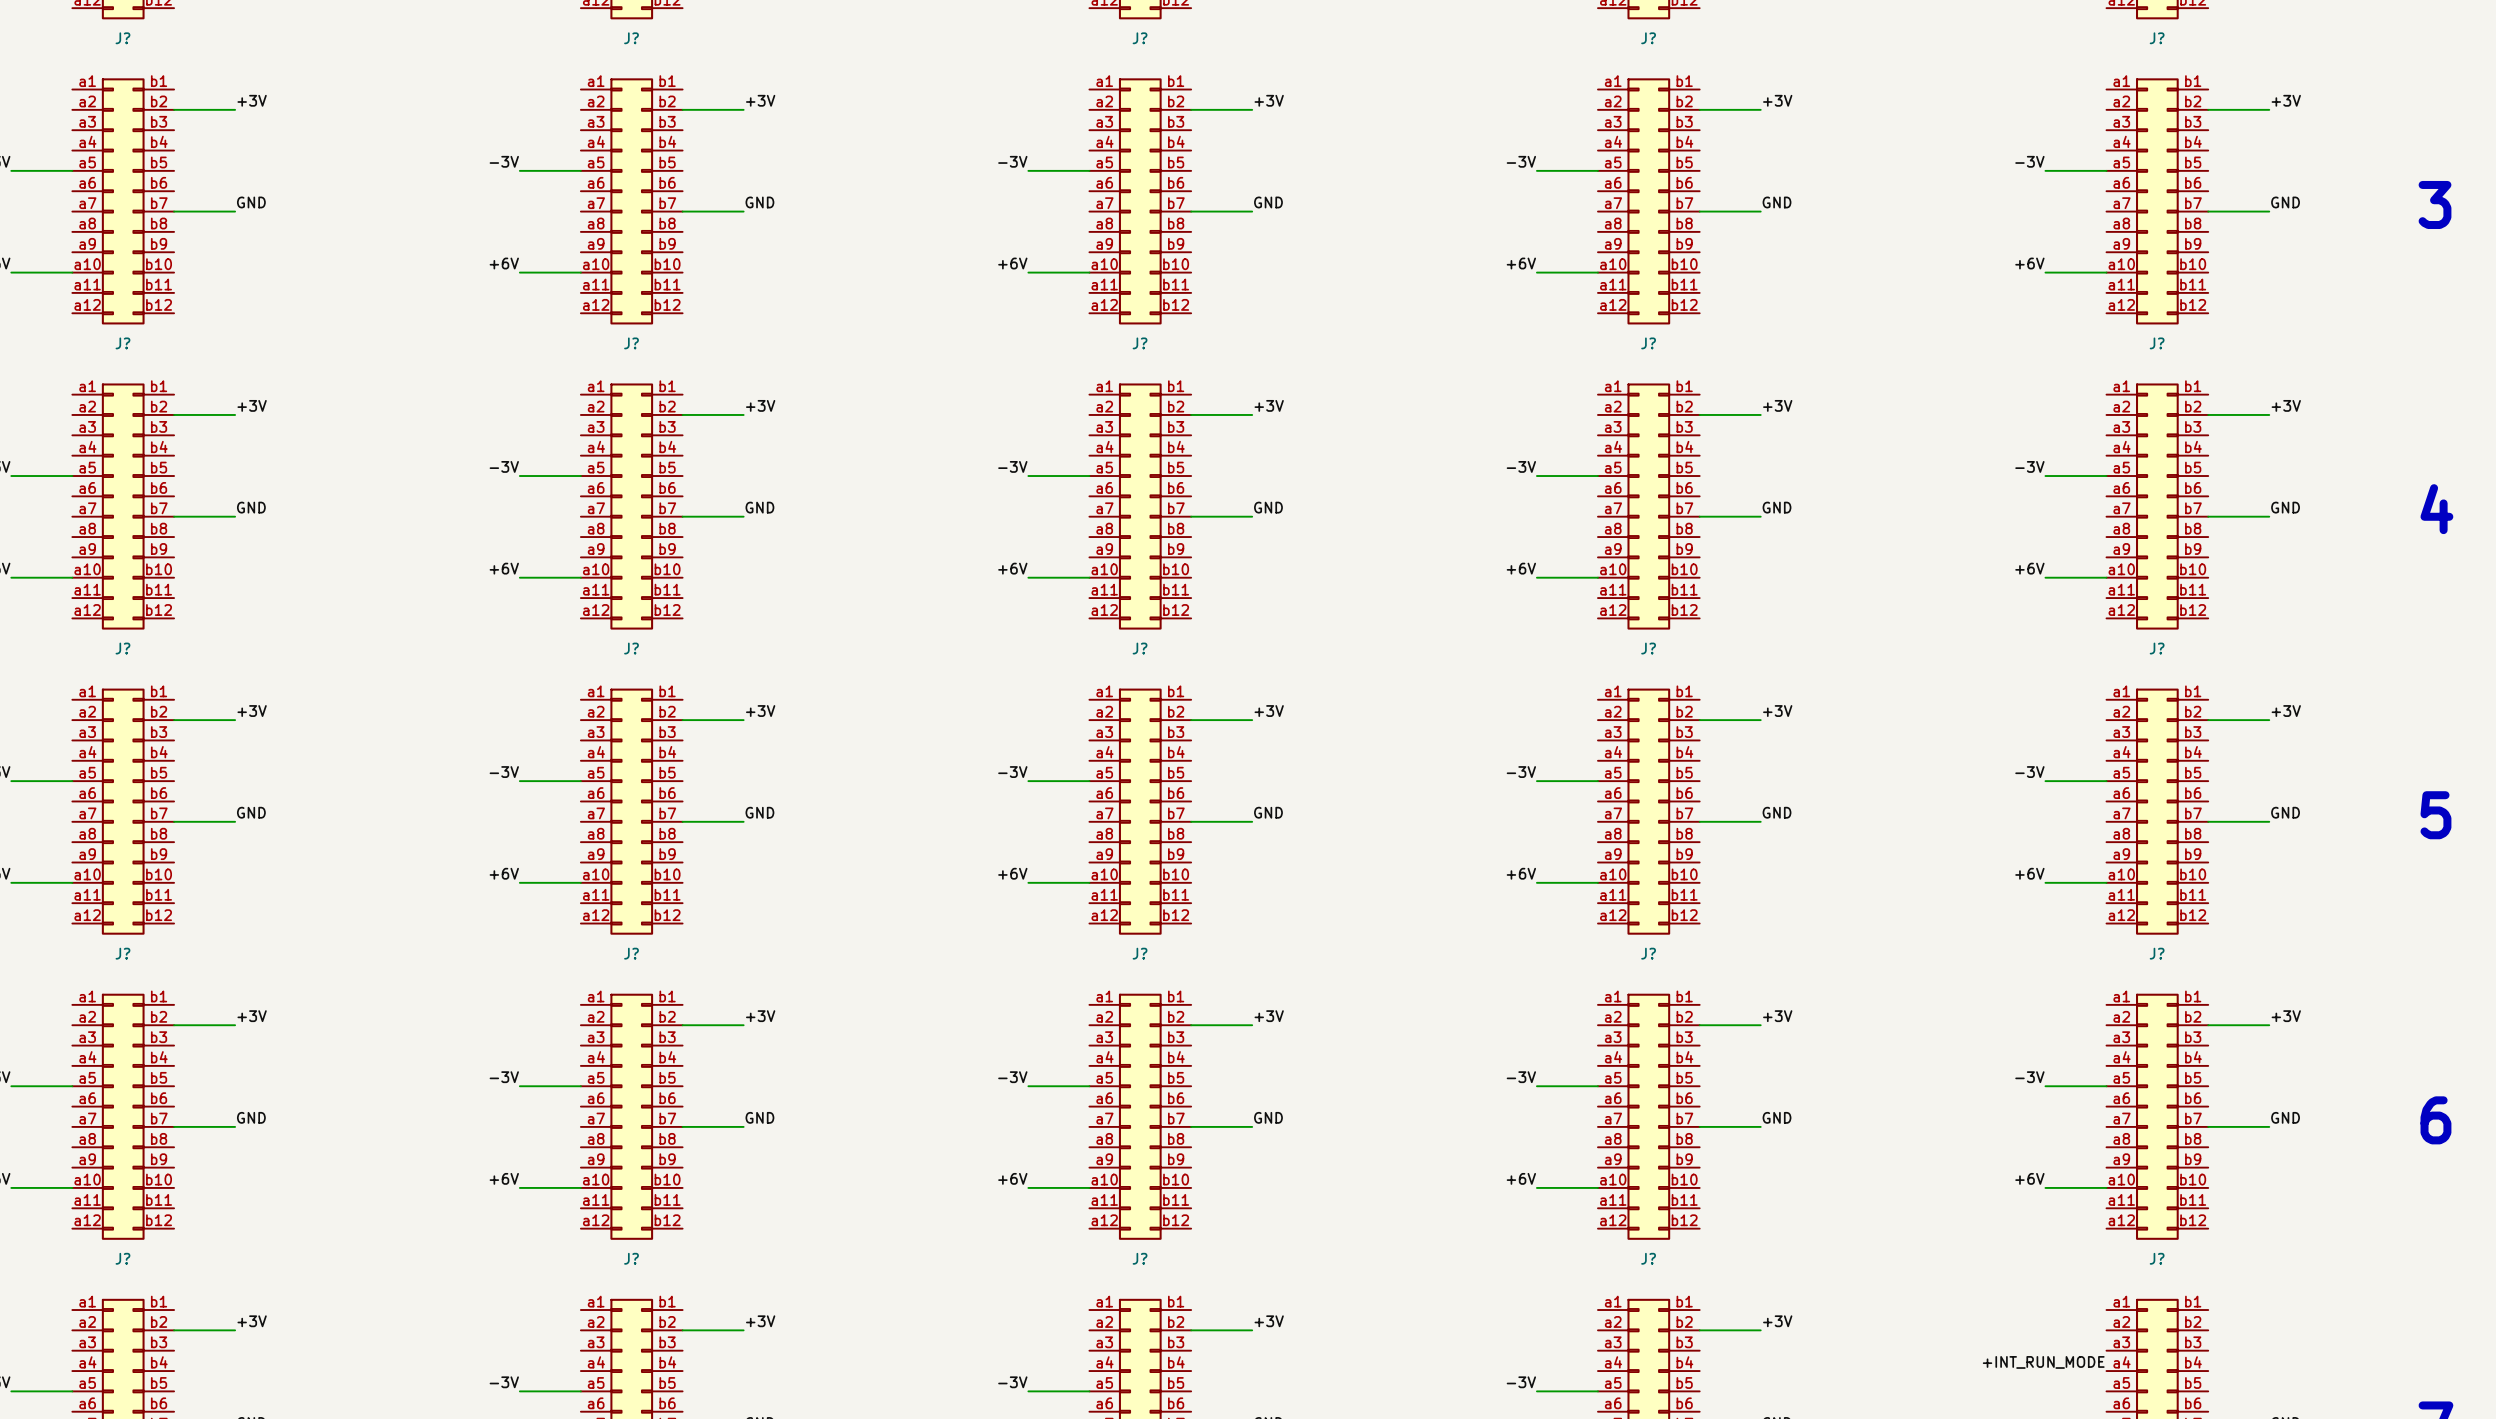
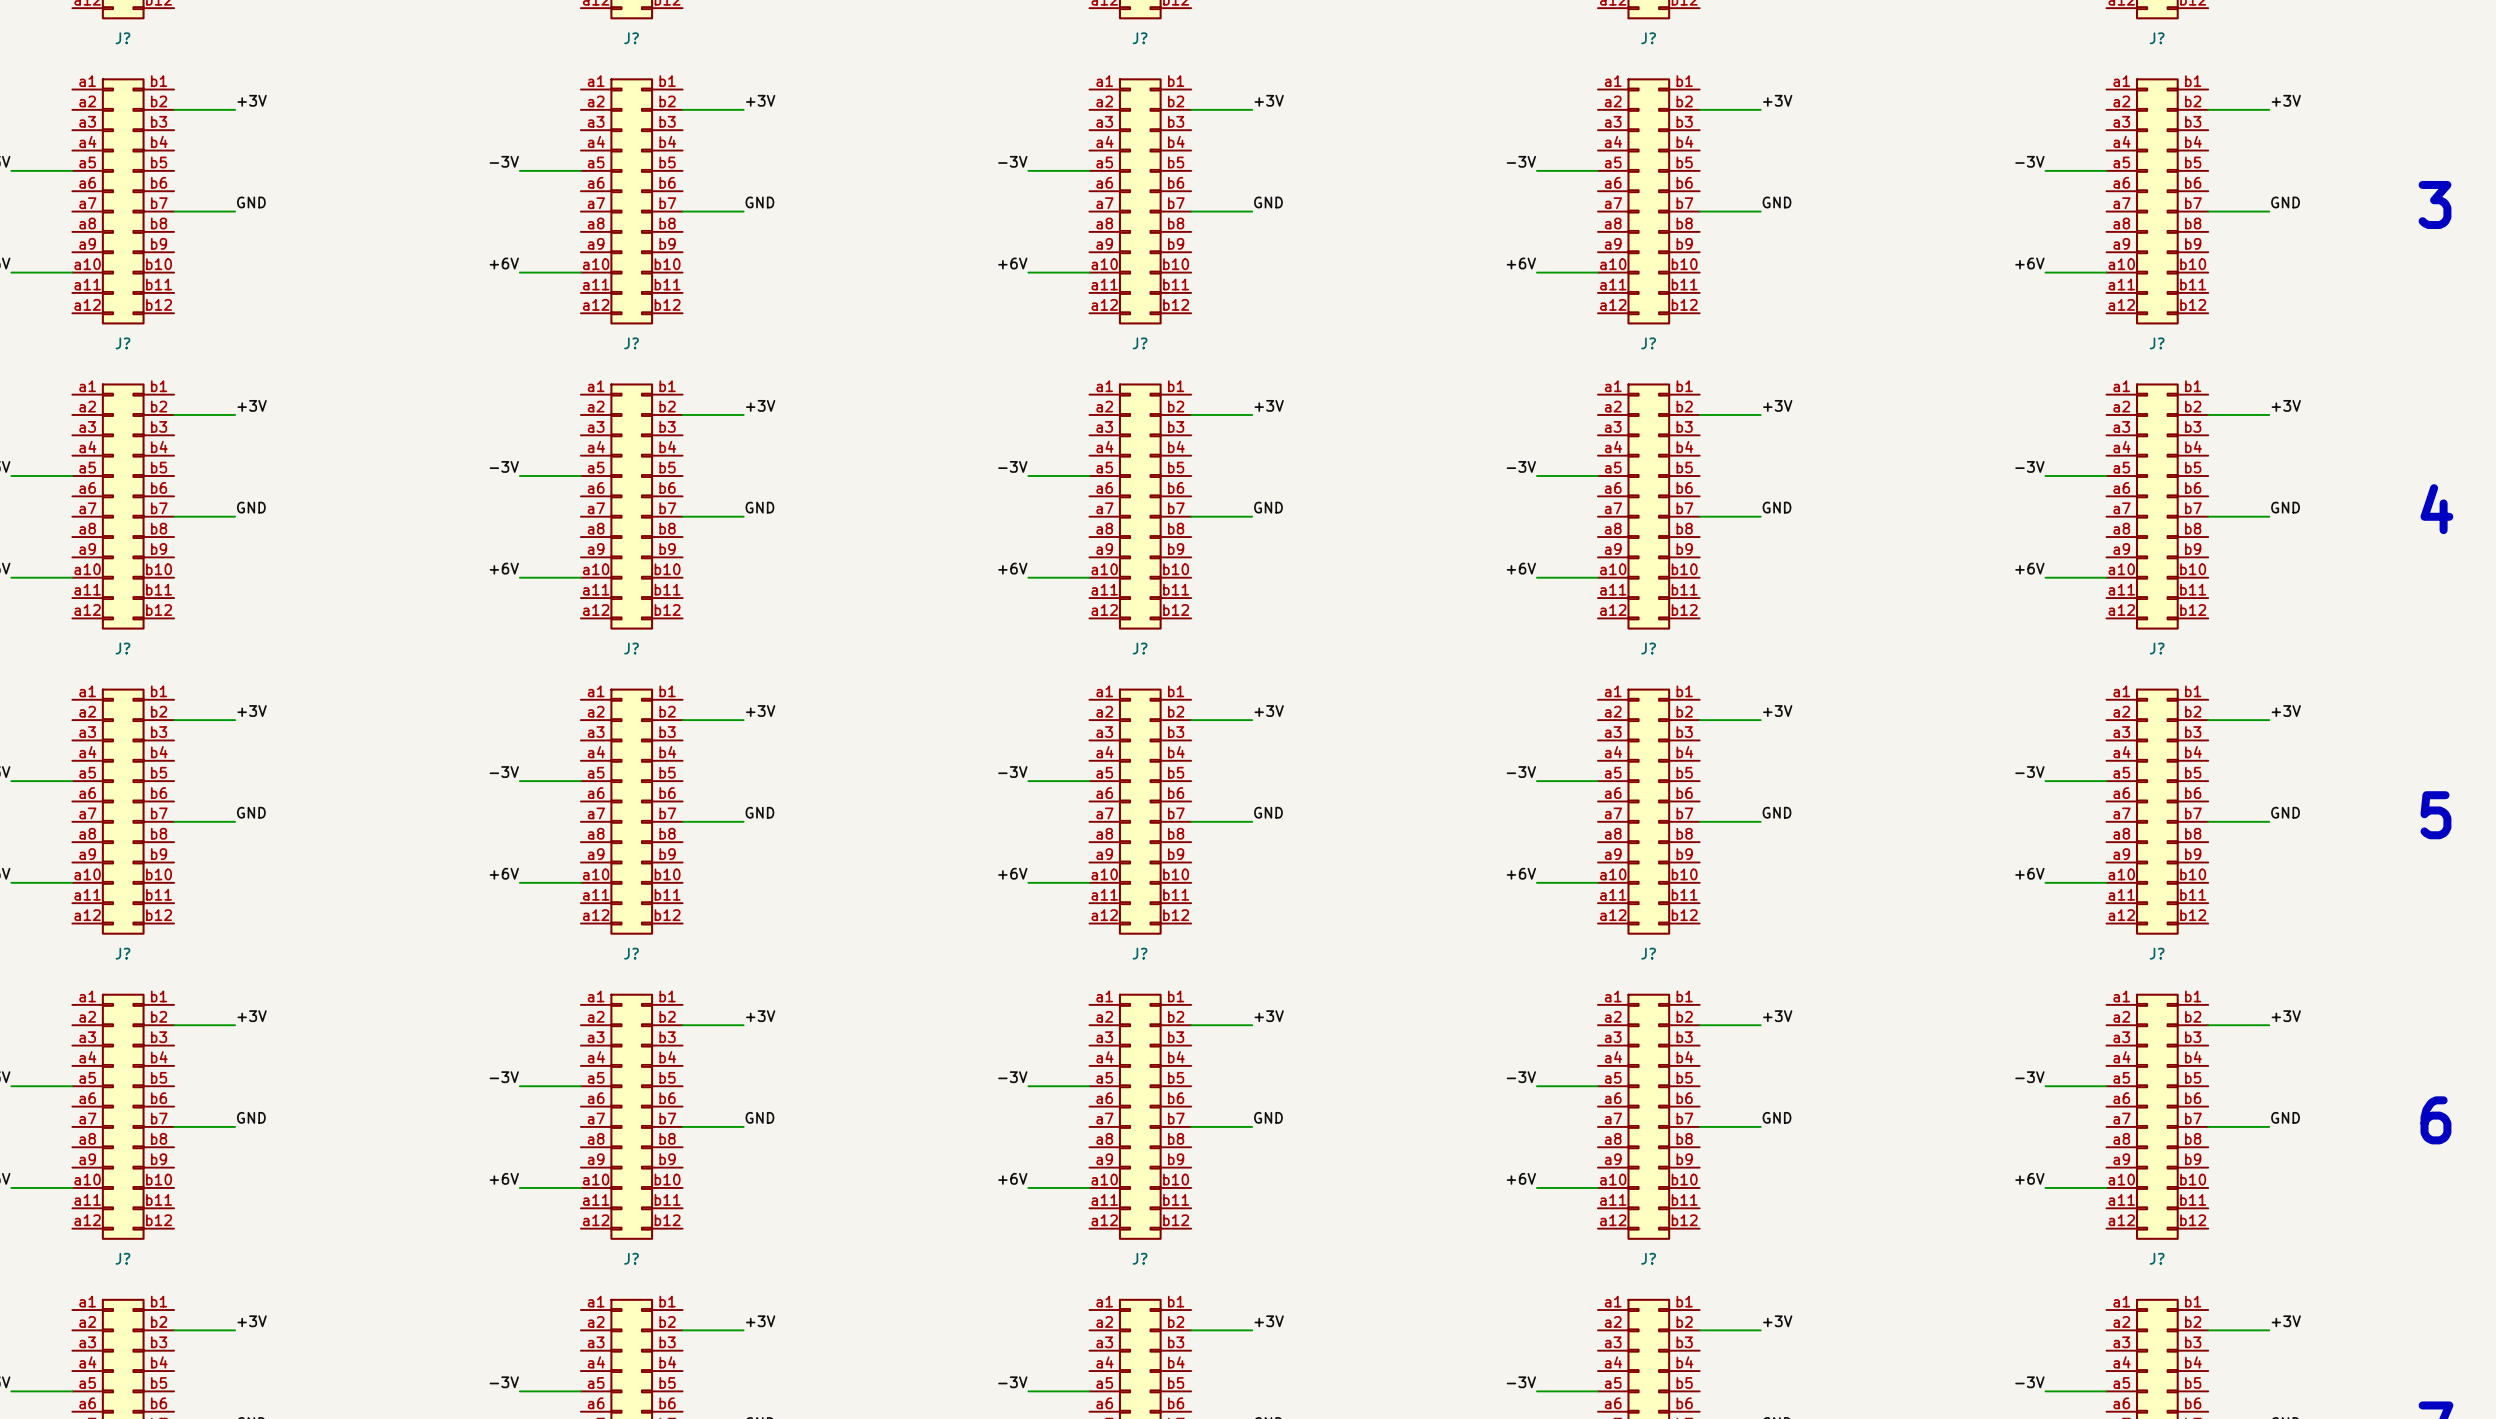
label: none -> +3V (2286, 1321)
wire: none -> (2208, 1330) (2269, 1330)
label: +INT_RUN_MODE (2043, 1362) -> none
label: none -> -3V (2029, 1382)
wire: none -> (2045, 1391) (2106, 1391)

